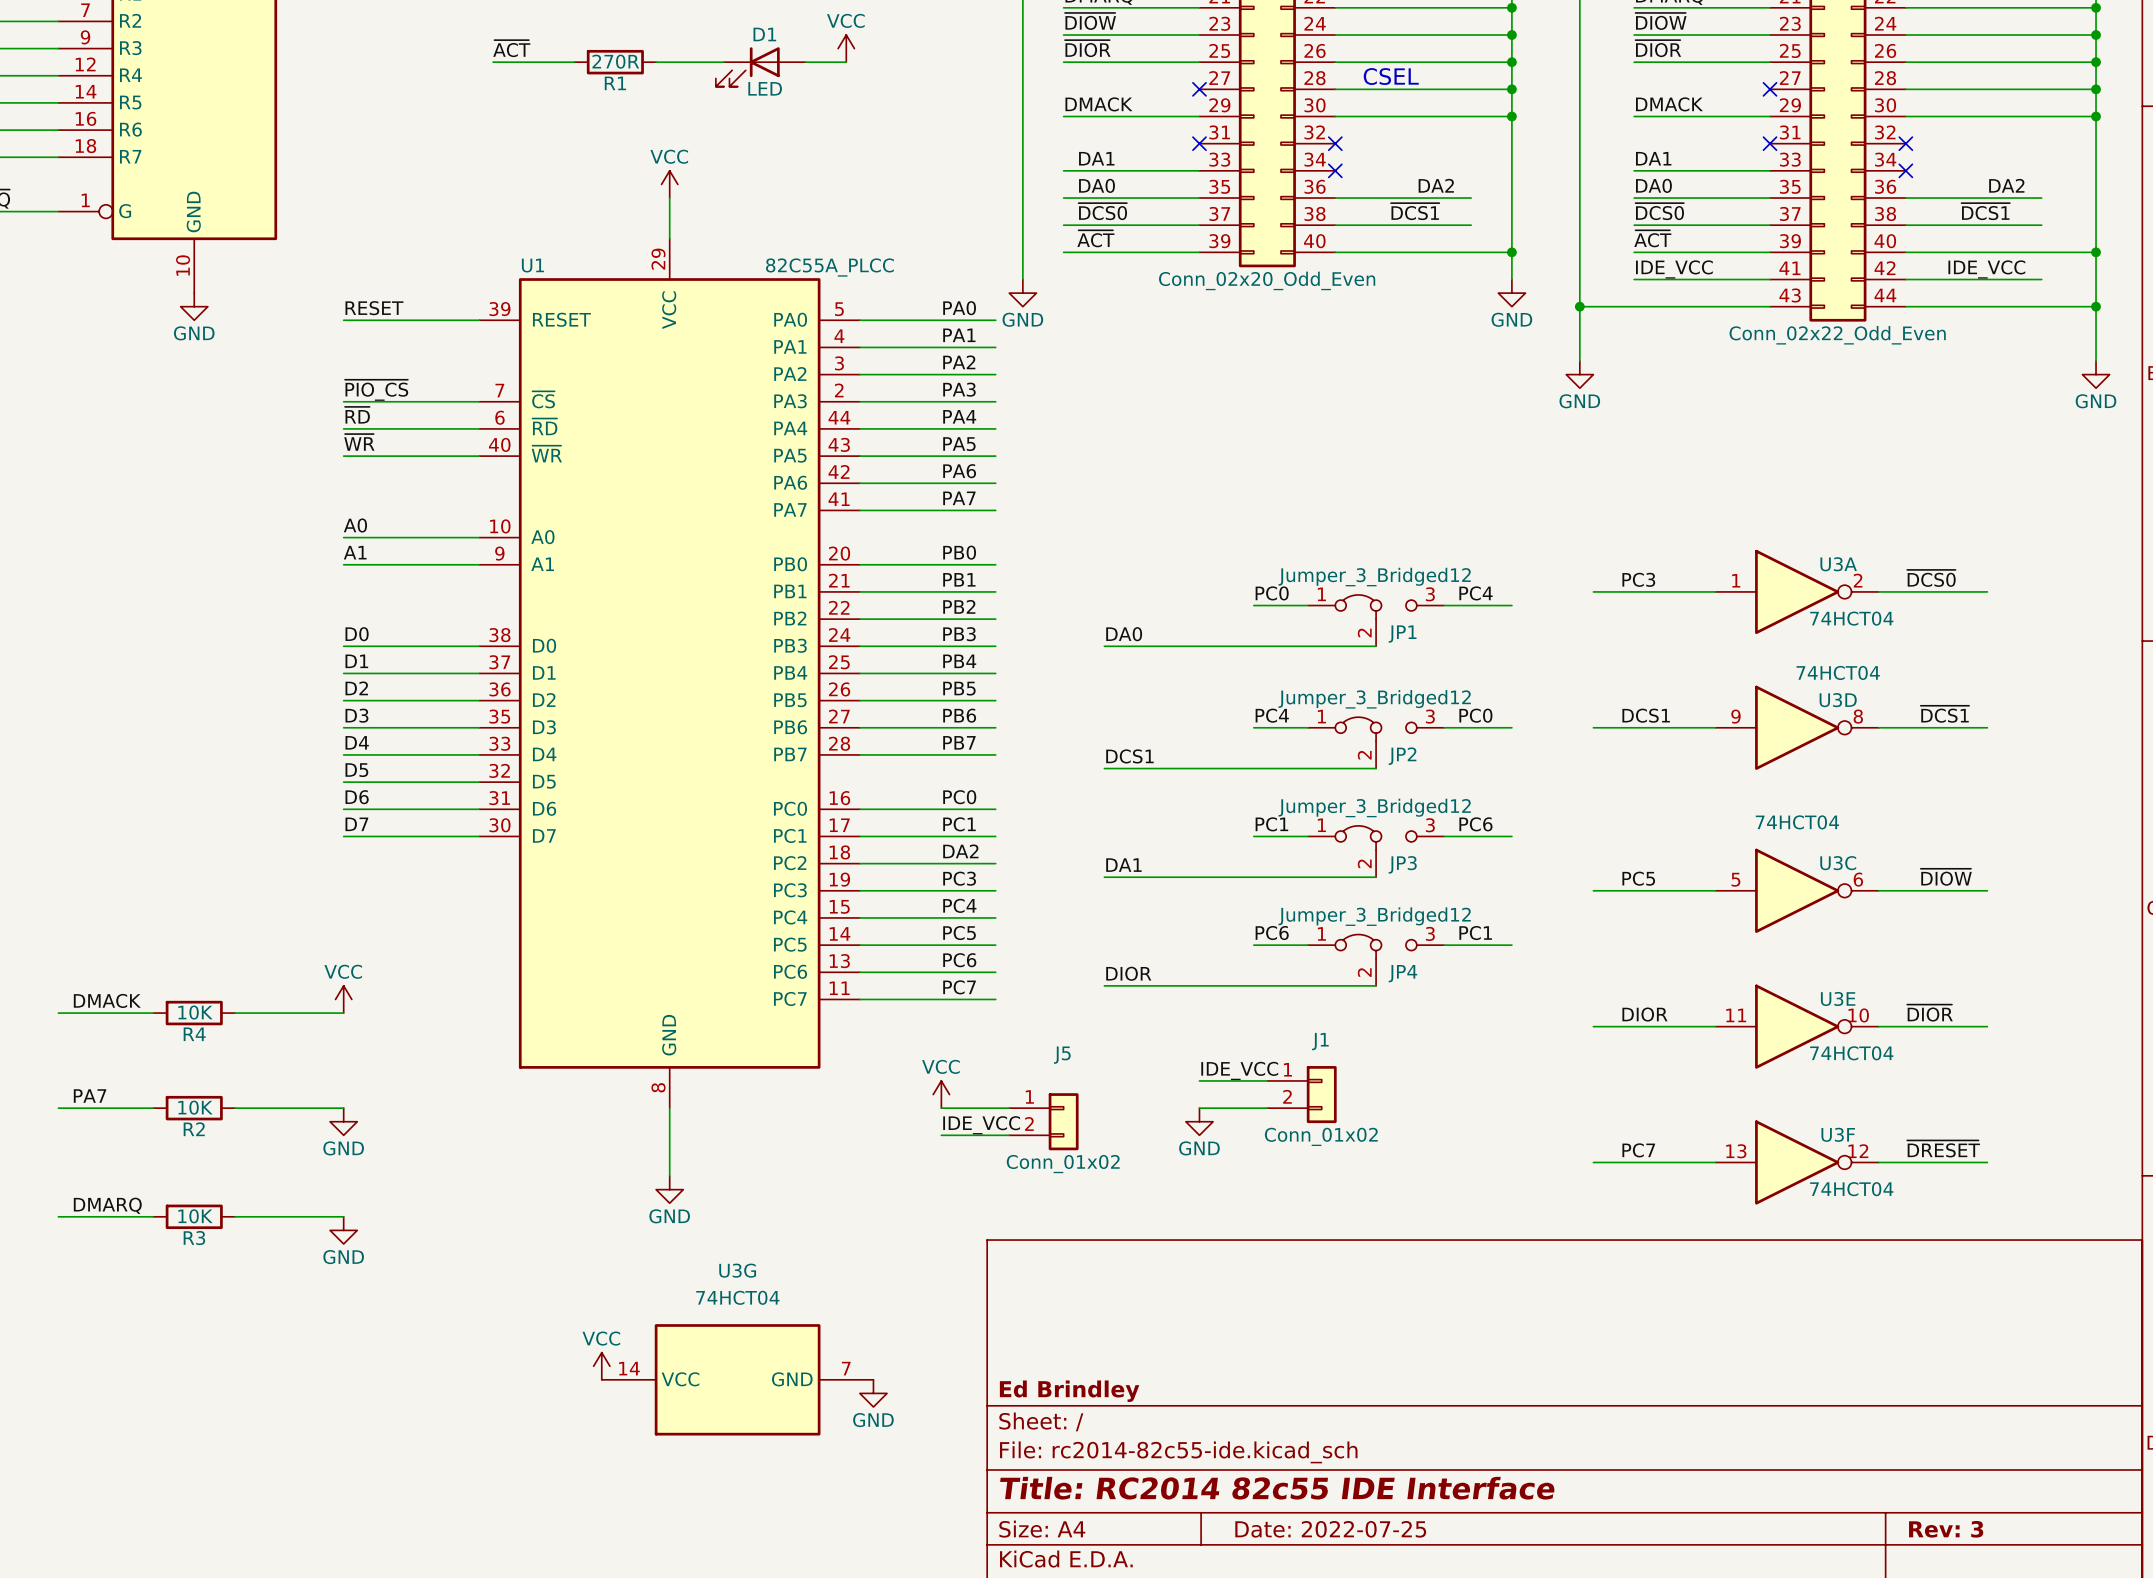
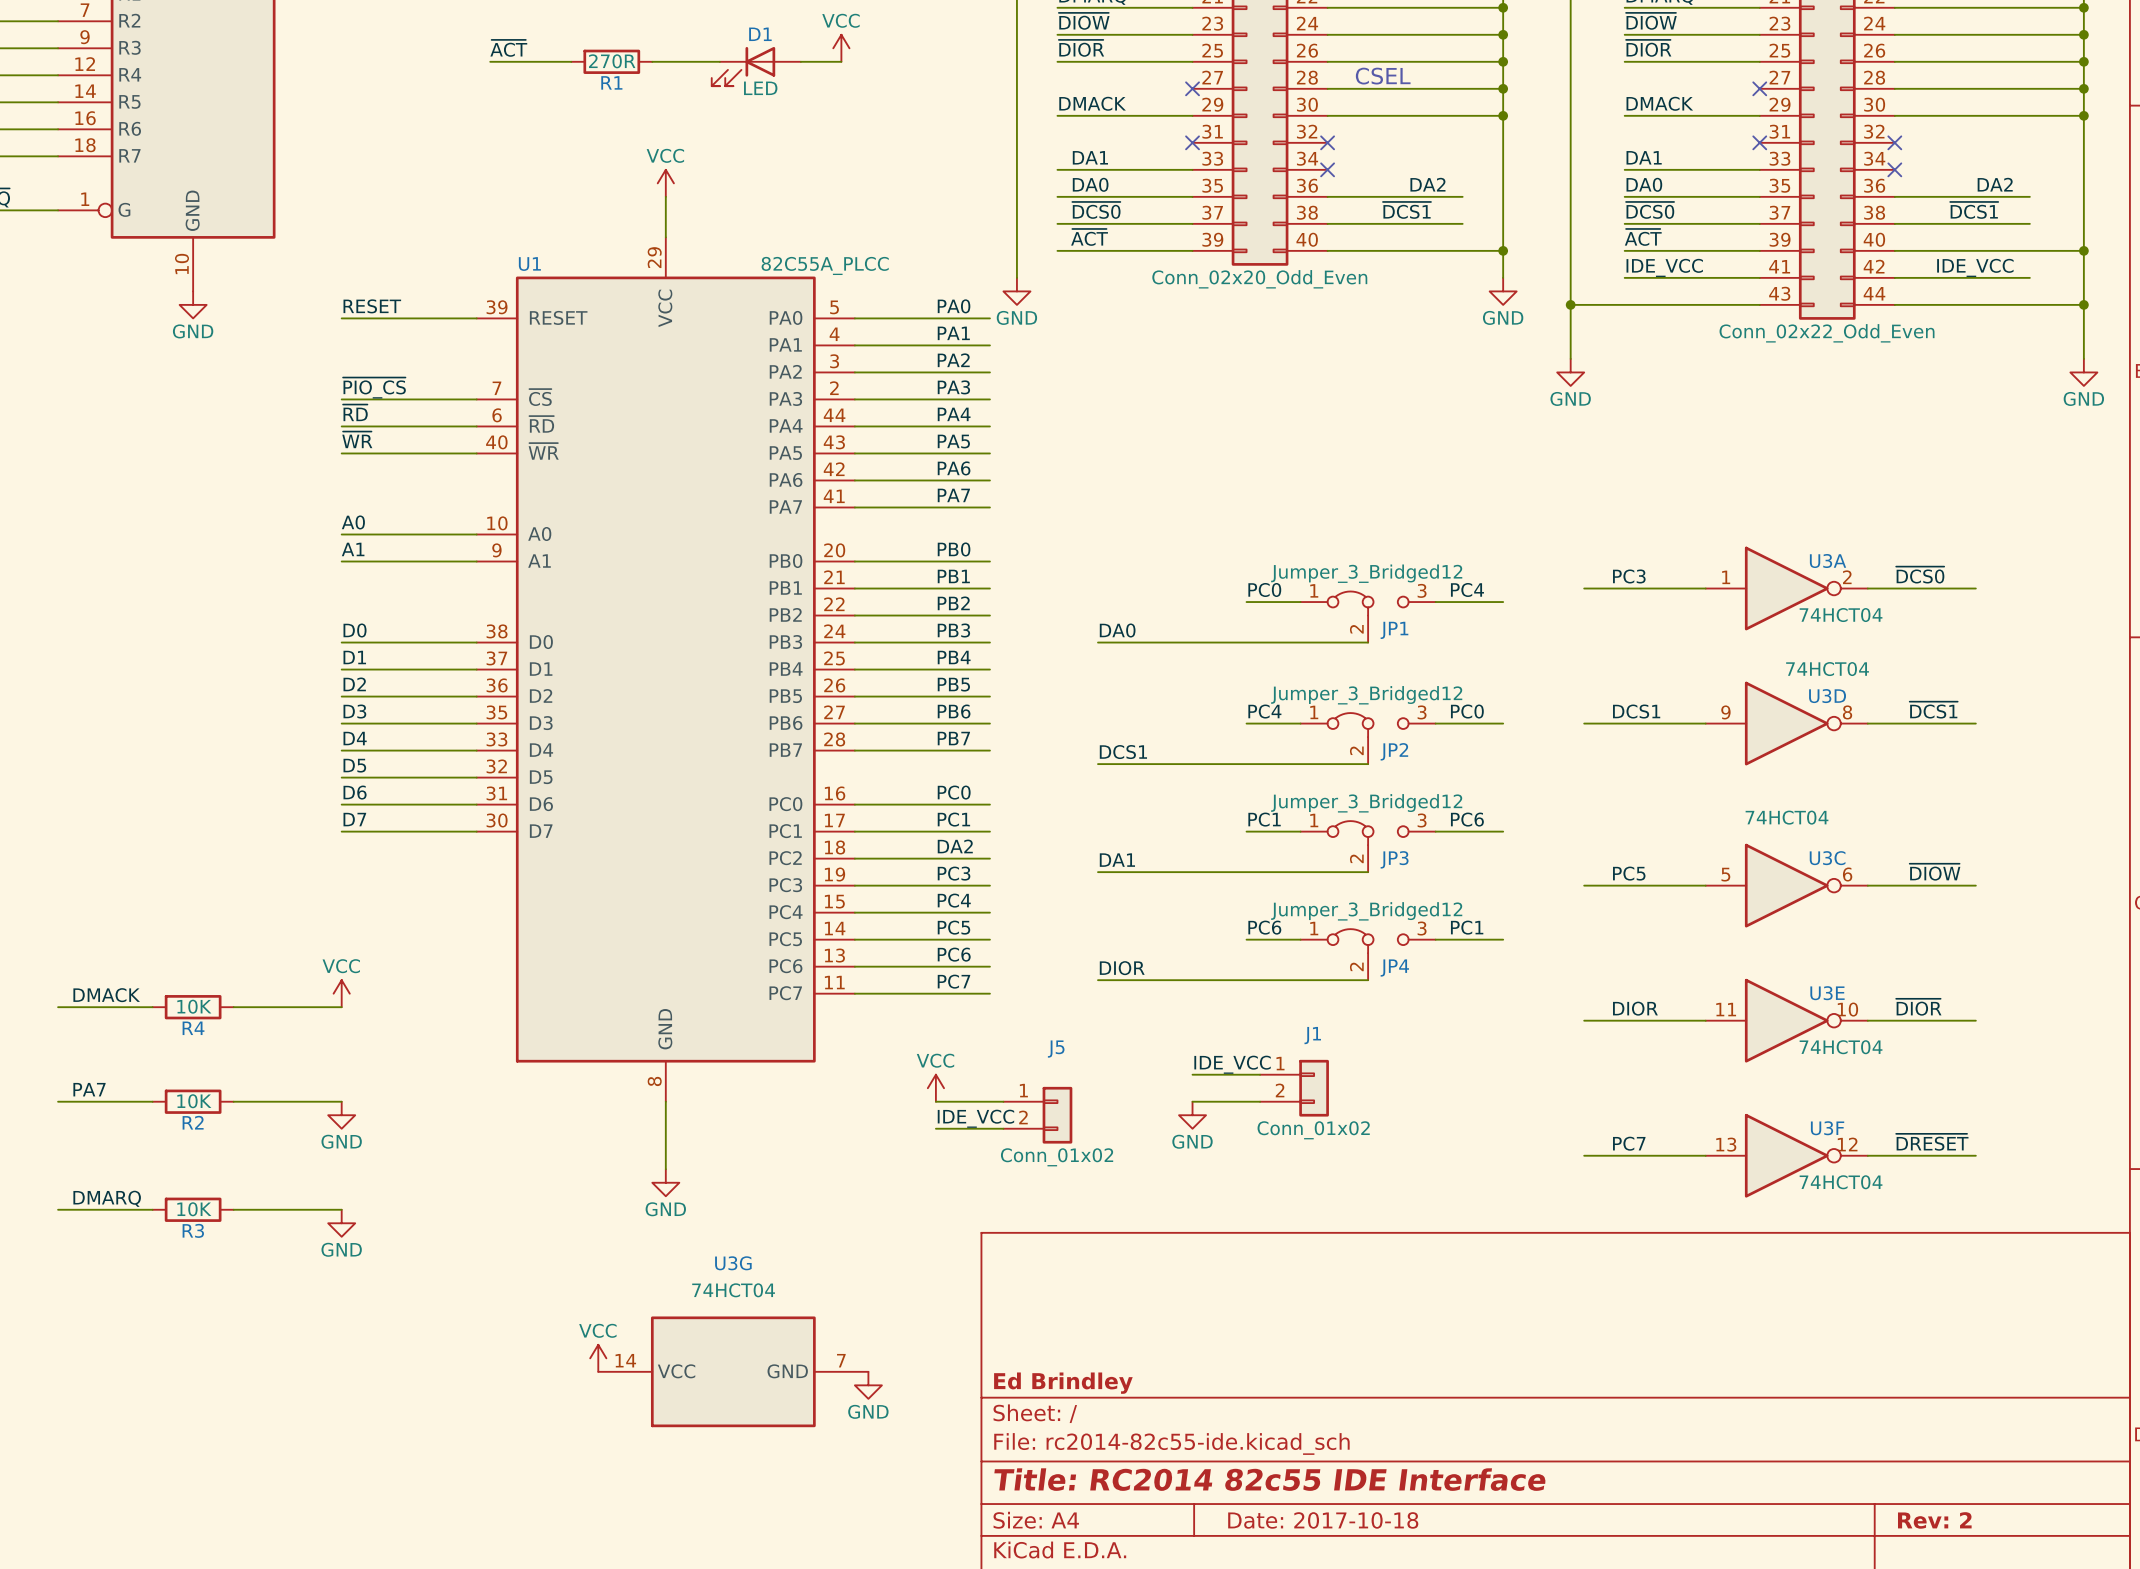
title block: Date: 2022-07-25 (1330, 1529) -> Date: 2017-10-18 (1323, 1520)
title block: Rev: 3 (1946, 1529) -> Rev: 2 (1934, 1520)

